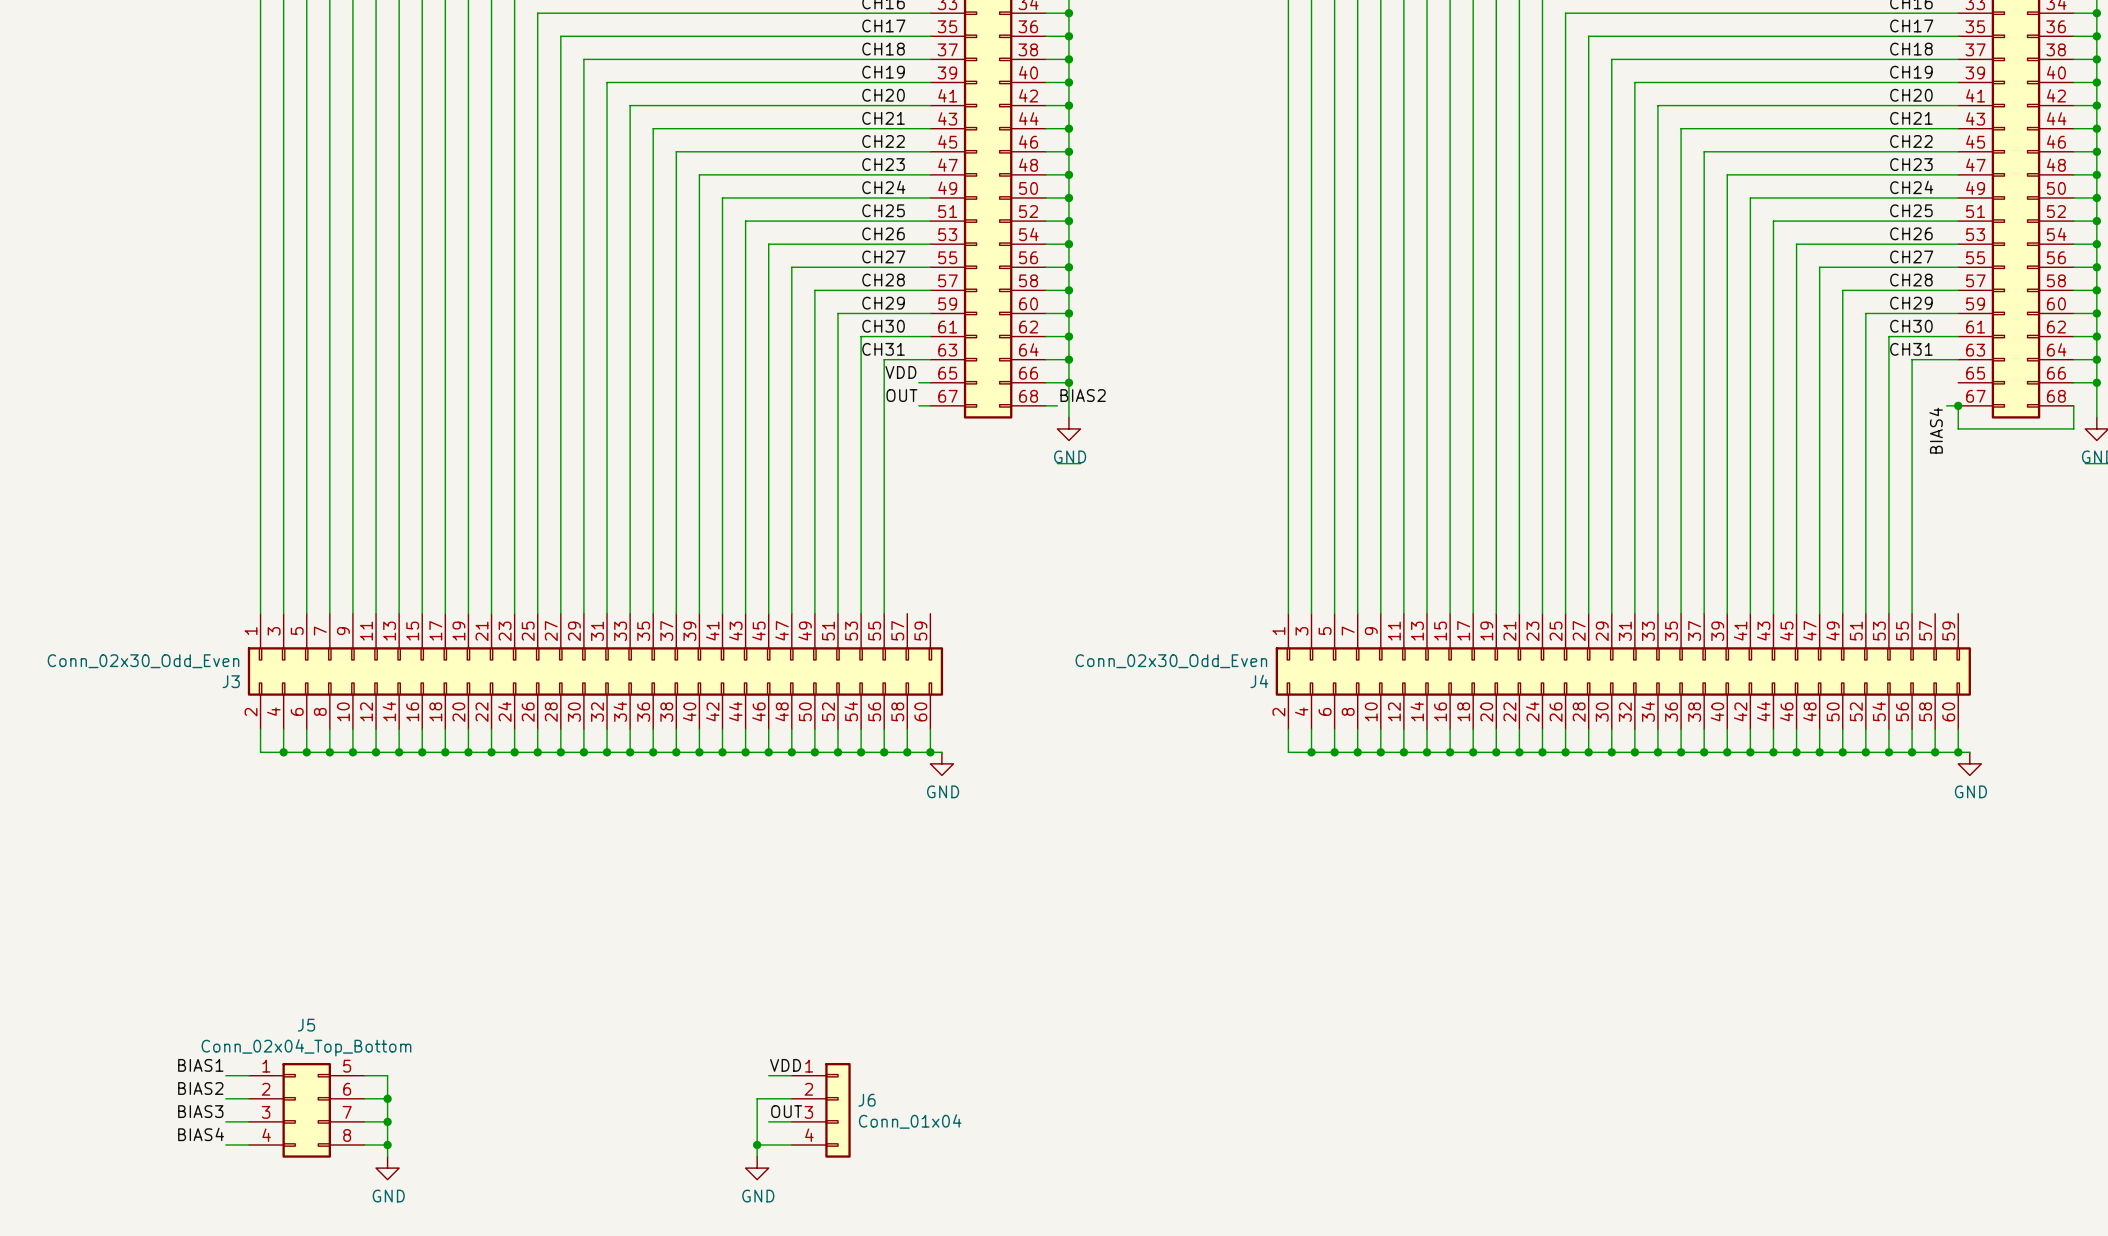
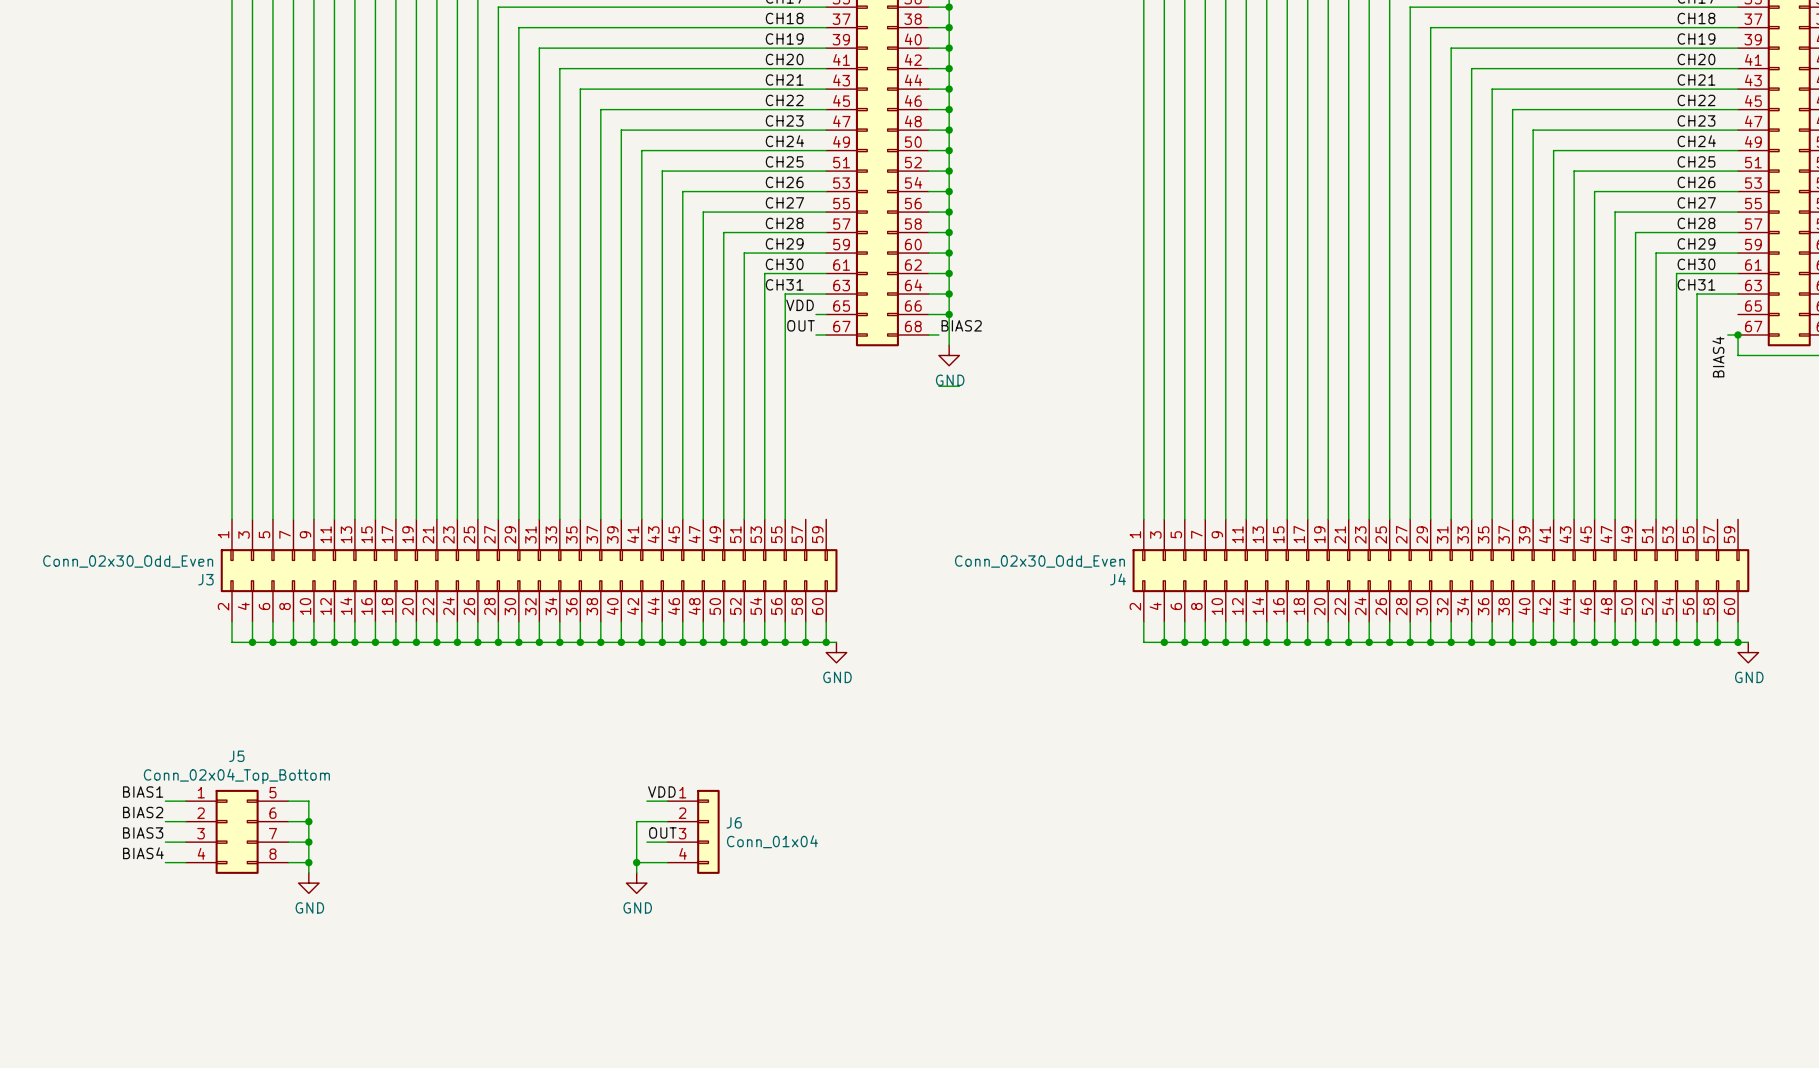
junction: none -> (308, 821)
junction: none -> (308, 842)
junction: none -> (308, 862)
junction: none -> (636, 862)
label position: BIAS1 (200, 1065) -> BIAS1 (143, 792)
label position: VDD (785, 1065) -> VDD (661, 792)
wire: (225, 1075) (249, 1075) -> (165, 801) (185, 801)
wire: (364, 1075) (387, 1075) (387, 1156) -> (288, 801) (308, 801) (308, 872)
wire: (768, 1075) (791, 1075) -> (646, 801) (667, 801)
label position: BIAS2 (200, 1088) -> BIAS2 (143, 812)
wire: (225, 1098) (249, 1098) -> (165, 821) (185, 821)
wire: (364, 1098) (387, 1098) -> (288, 821) (308, 821)
junction: (387, 1098) -> none
wire: (791, 1098) (757, 1098) (757, 1156) -> (667, 821) (636, 821) (636, 872)
J5 position: (306, 1110) -> (237, 831)
J6 position: (821, 1110) -> (693, 831)
label position: BIAS3 (200, 1111) -> BIAS3 (143, 832)
label position: OUT (786, 1111) -> OUT (662, 832)
wire: (225, 1121) (249, 1121) -> (165, 842) (185, 842)
wire: (364, 1121) (387, 1121) -> (288, 842) (308, 842)
junction: (387, 1121) -> none
wire: (768, 1121) (791, 1121) -> (646, 842) (667, 842)
label position: BIAS4 (201, 1134) -> BIAS4 (143, 853)
wire: (225, 1144) (249, 1144) -> (165, 862) (185, 862)
wire: (364, 1144) (387, 1144) -> (288, 862) (308, 862)
junction: (387, 1144) -> none
wire: (757, 1144) (791, 1144) -> (636, 862) (667, 862)
junction: (757, 1144) -> none
power symbol position: GND (387, 1168) -> GND (308, 883)
power symbol position: GND (757, 1168) -> GND (636, 883)

